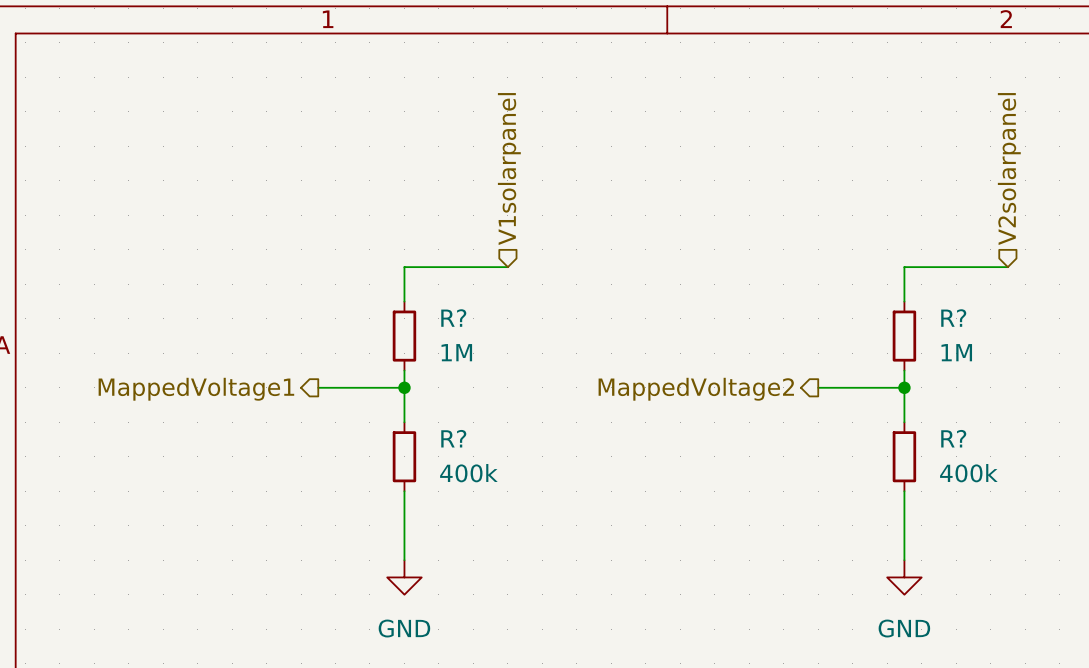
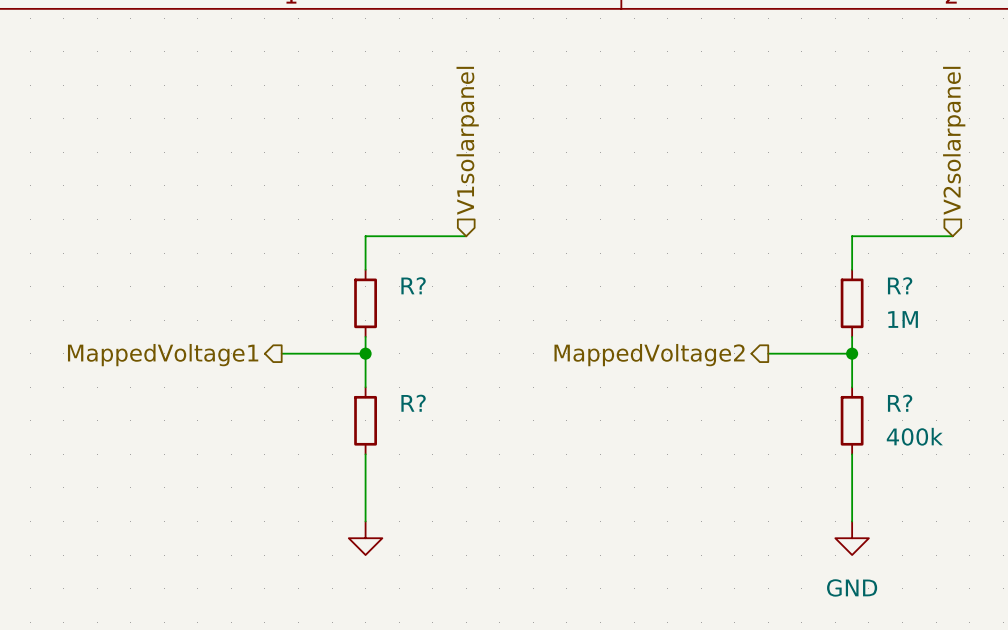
R? value: 1M (456, 352) -> none
R? value: 400k (468, 473) -> none
power symbol text: GND (404, 628) -> none

